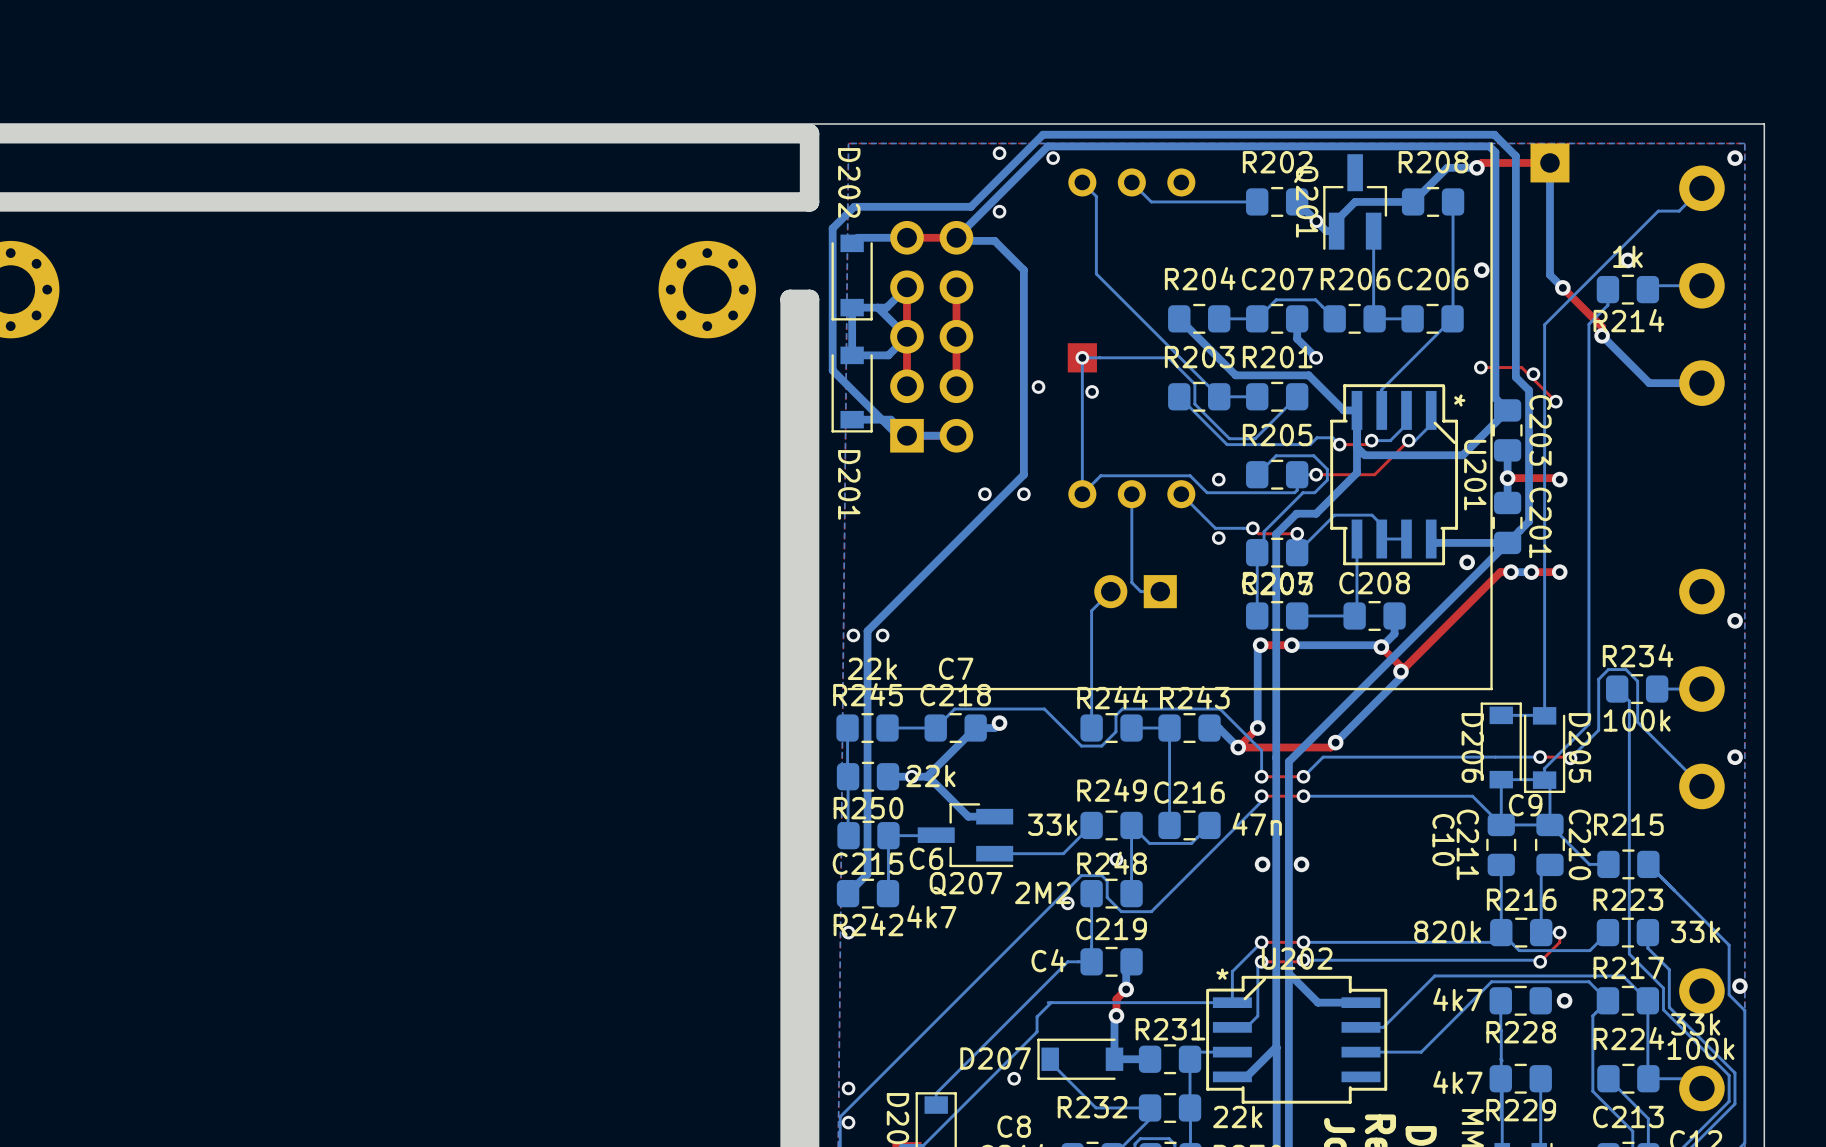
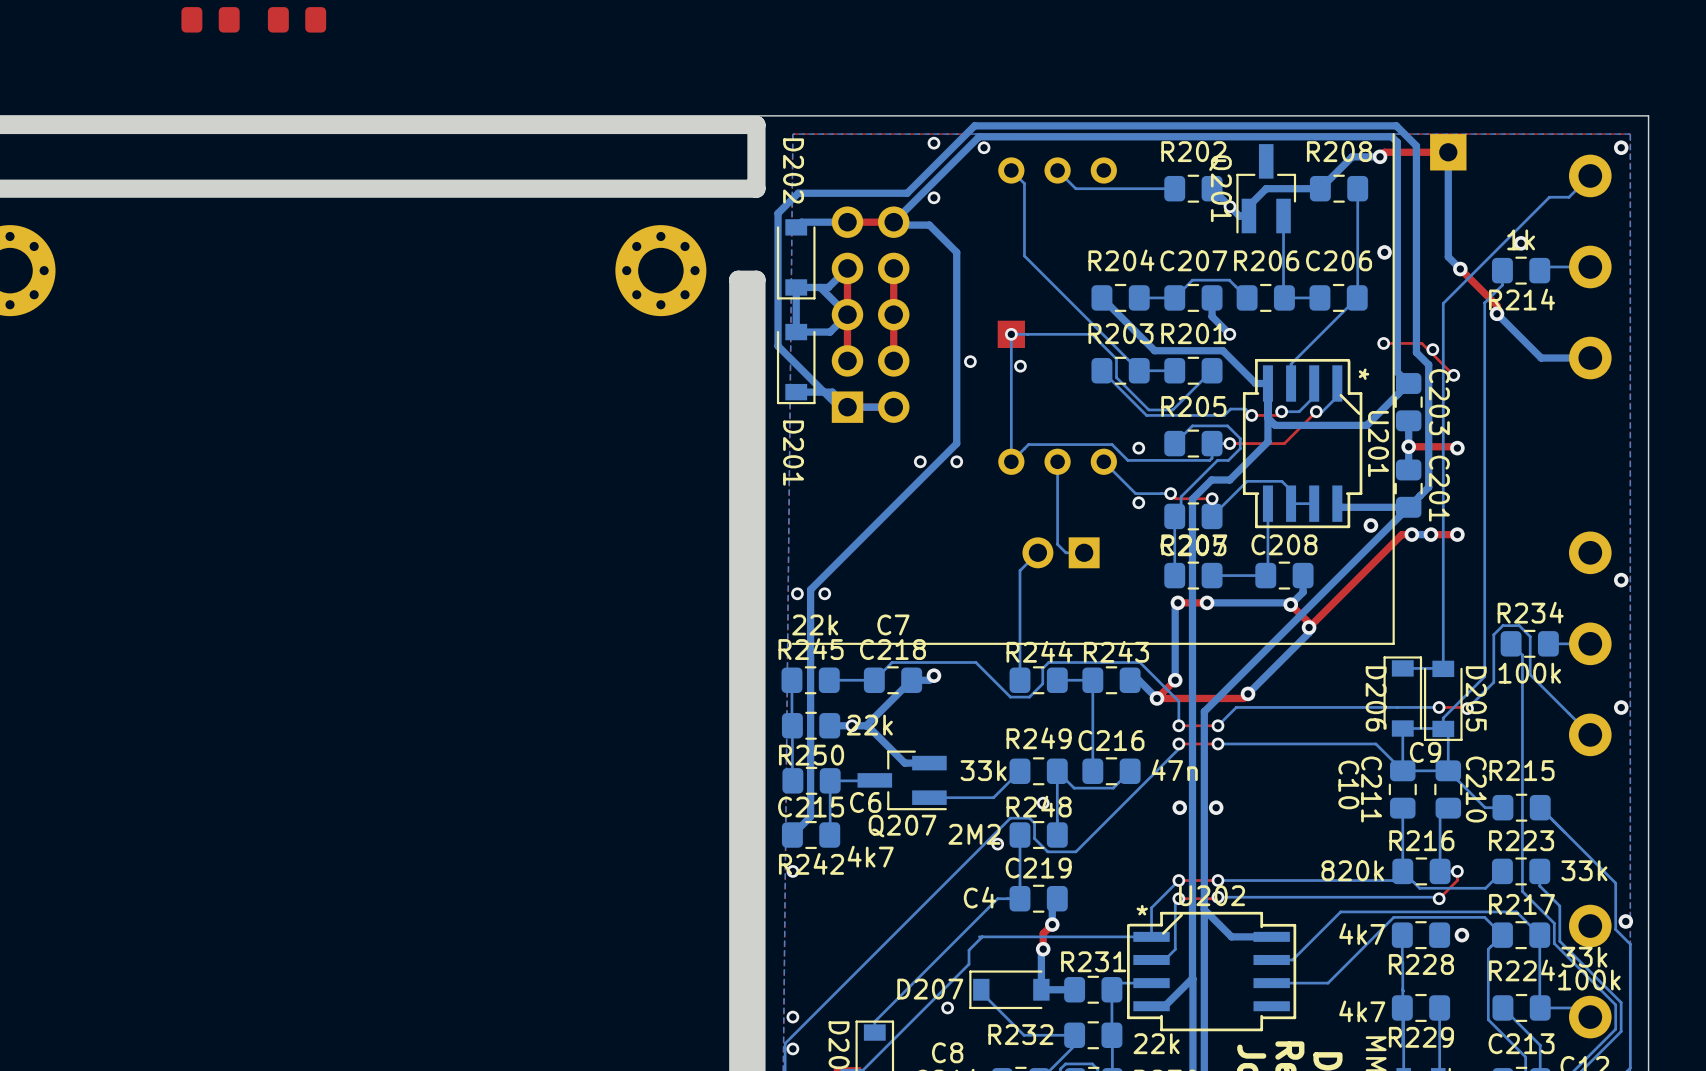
part: none -> (210, 19)
part: none -> (297, 19)

